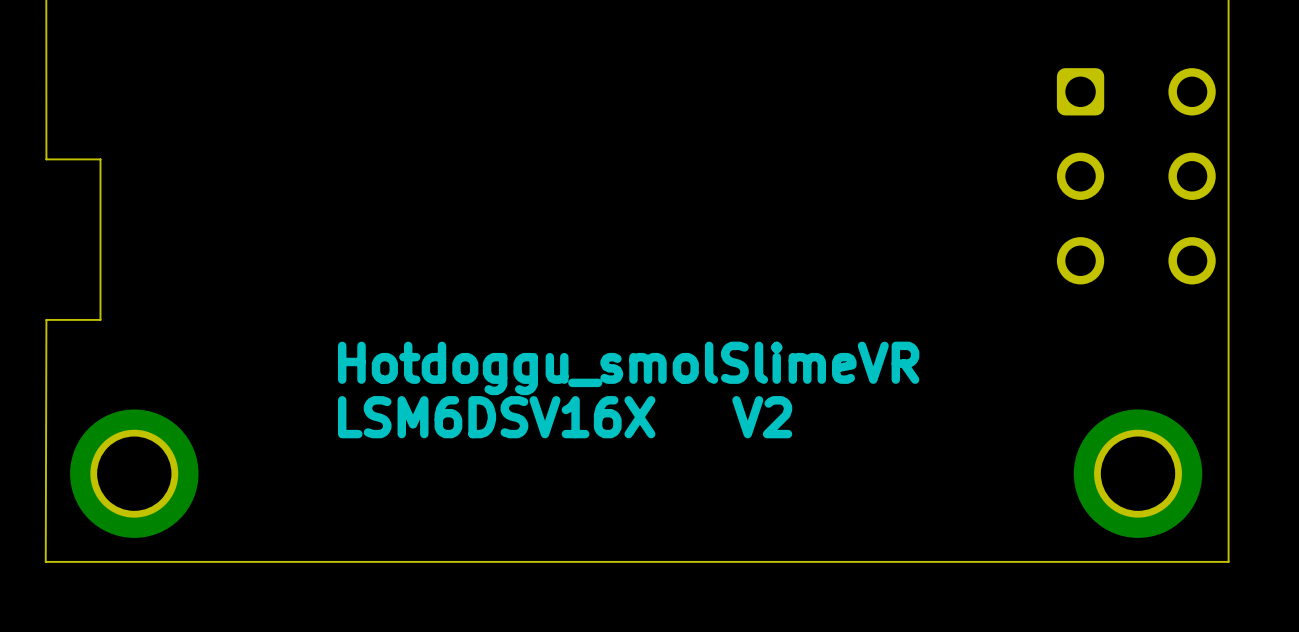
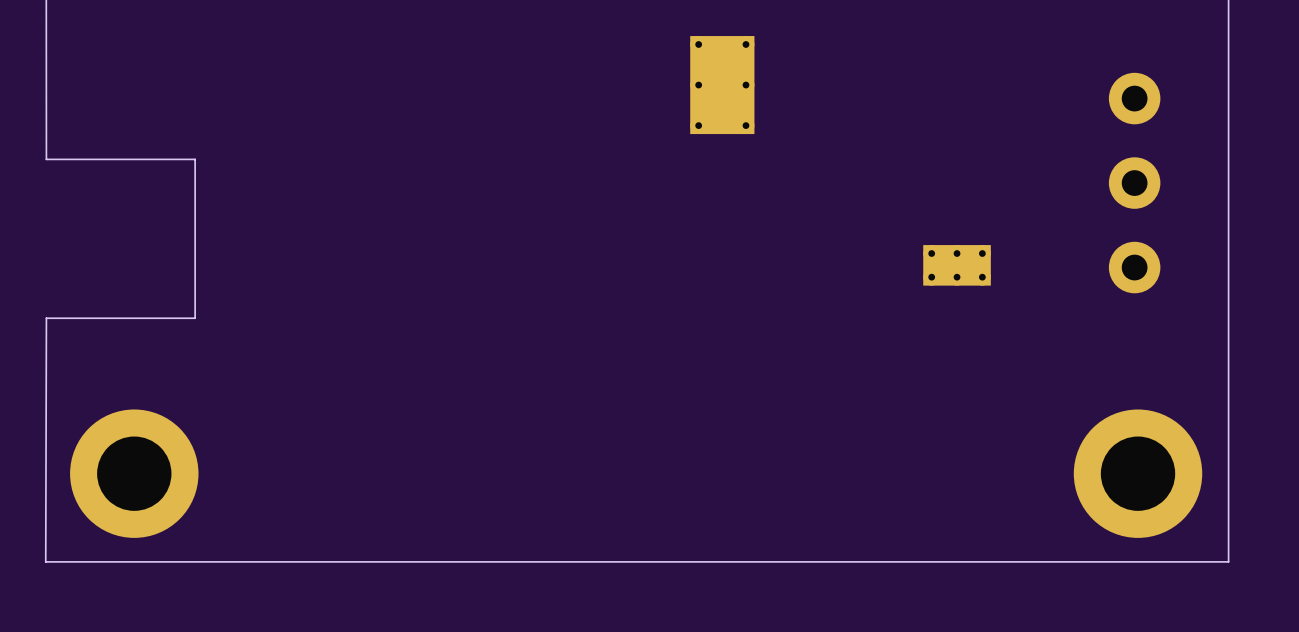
part footprint: [1056, 68, 1216, 285] -> [1108, 72, 1161, 294]
part: none -> (722, 85)
board edge: (100, 159) (100, 319) (46, 319) -> (100, 159) (195, 159) (195, 318) (46, 318) (46, 319)
part: none -> (957, 265)
text: Hotdoggu_smolSlimeVR (628, 368) -> none
text: LSM6DSV16X V2 (565, 417) -> none

